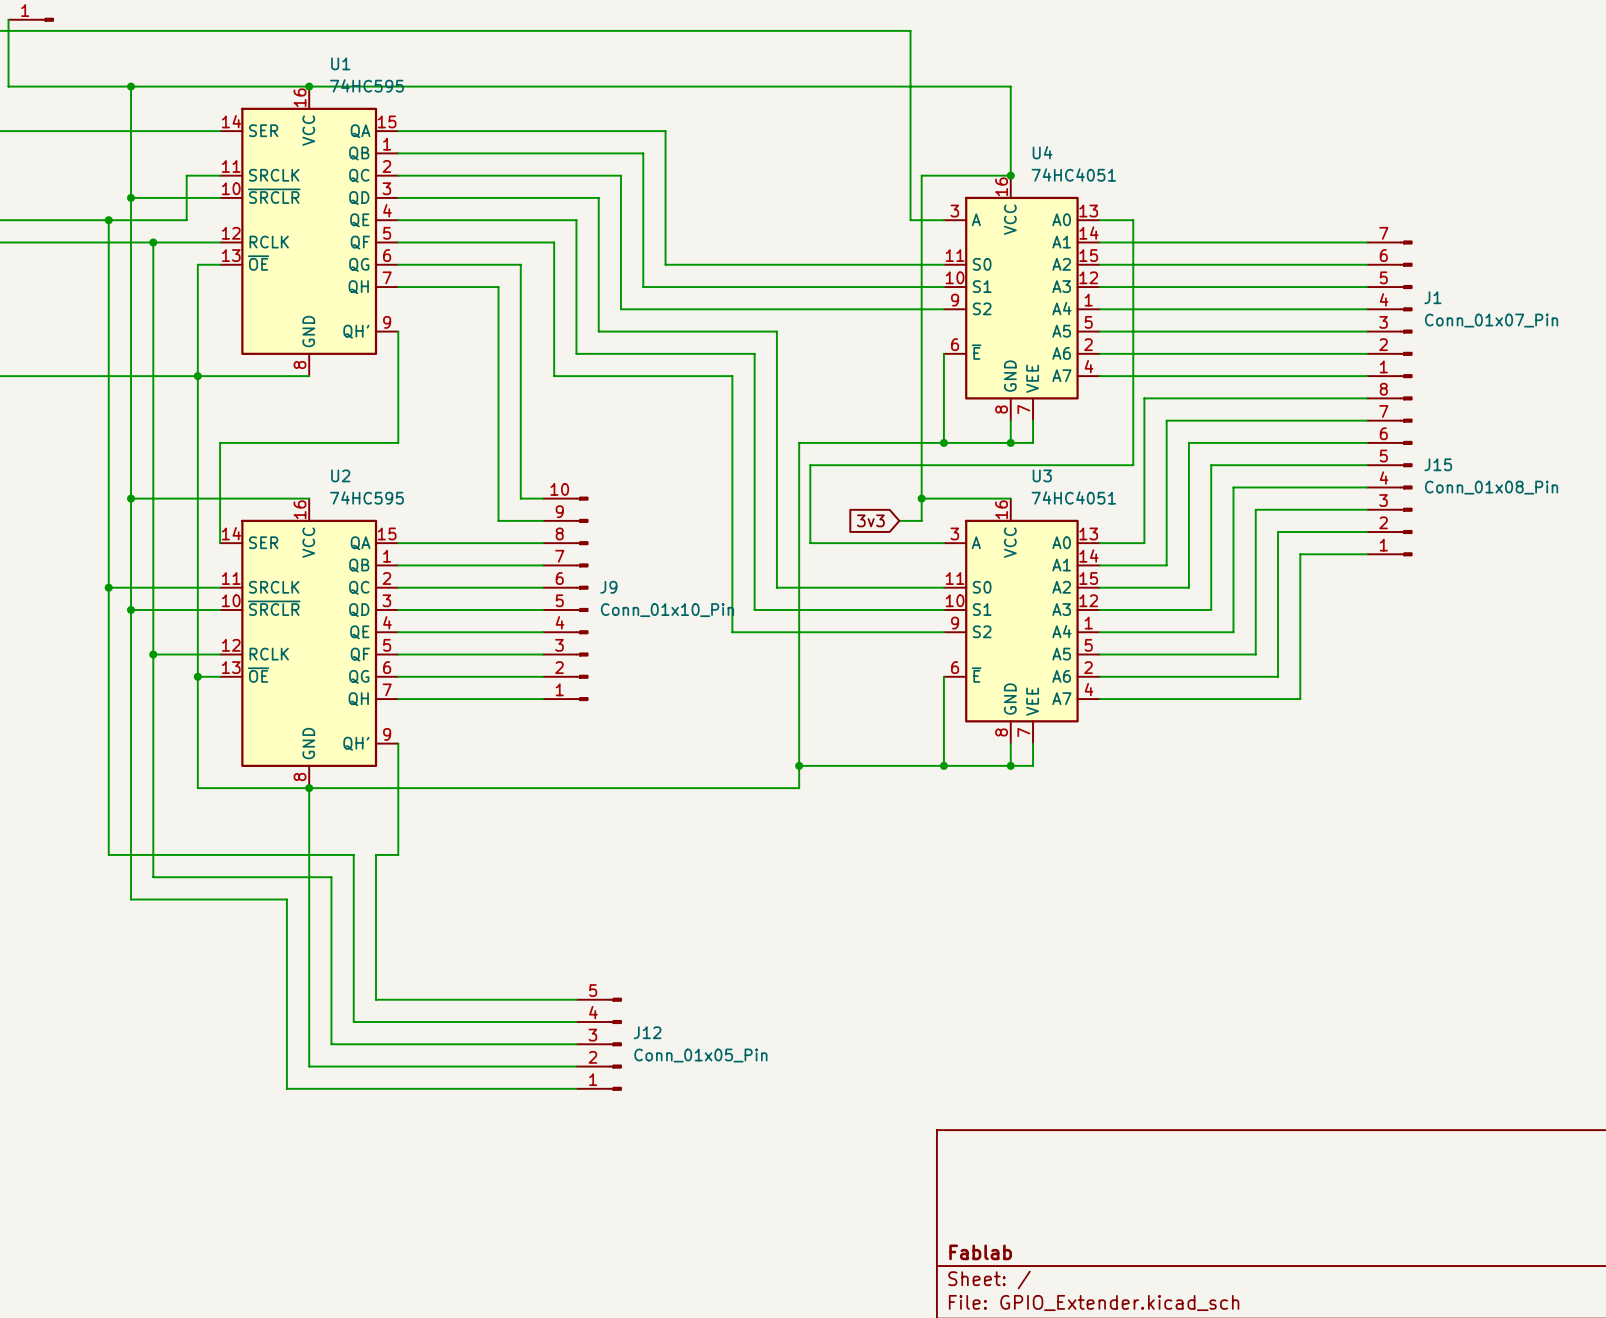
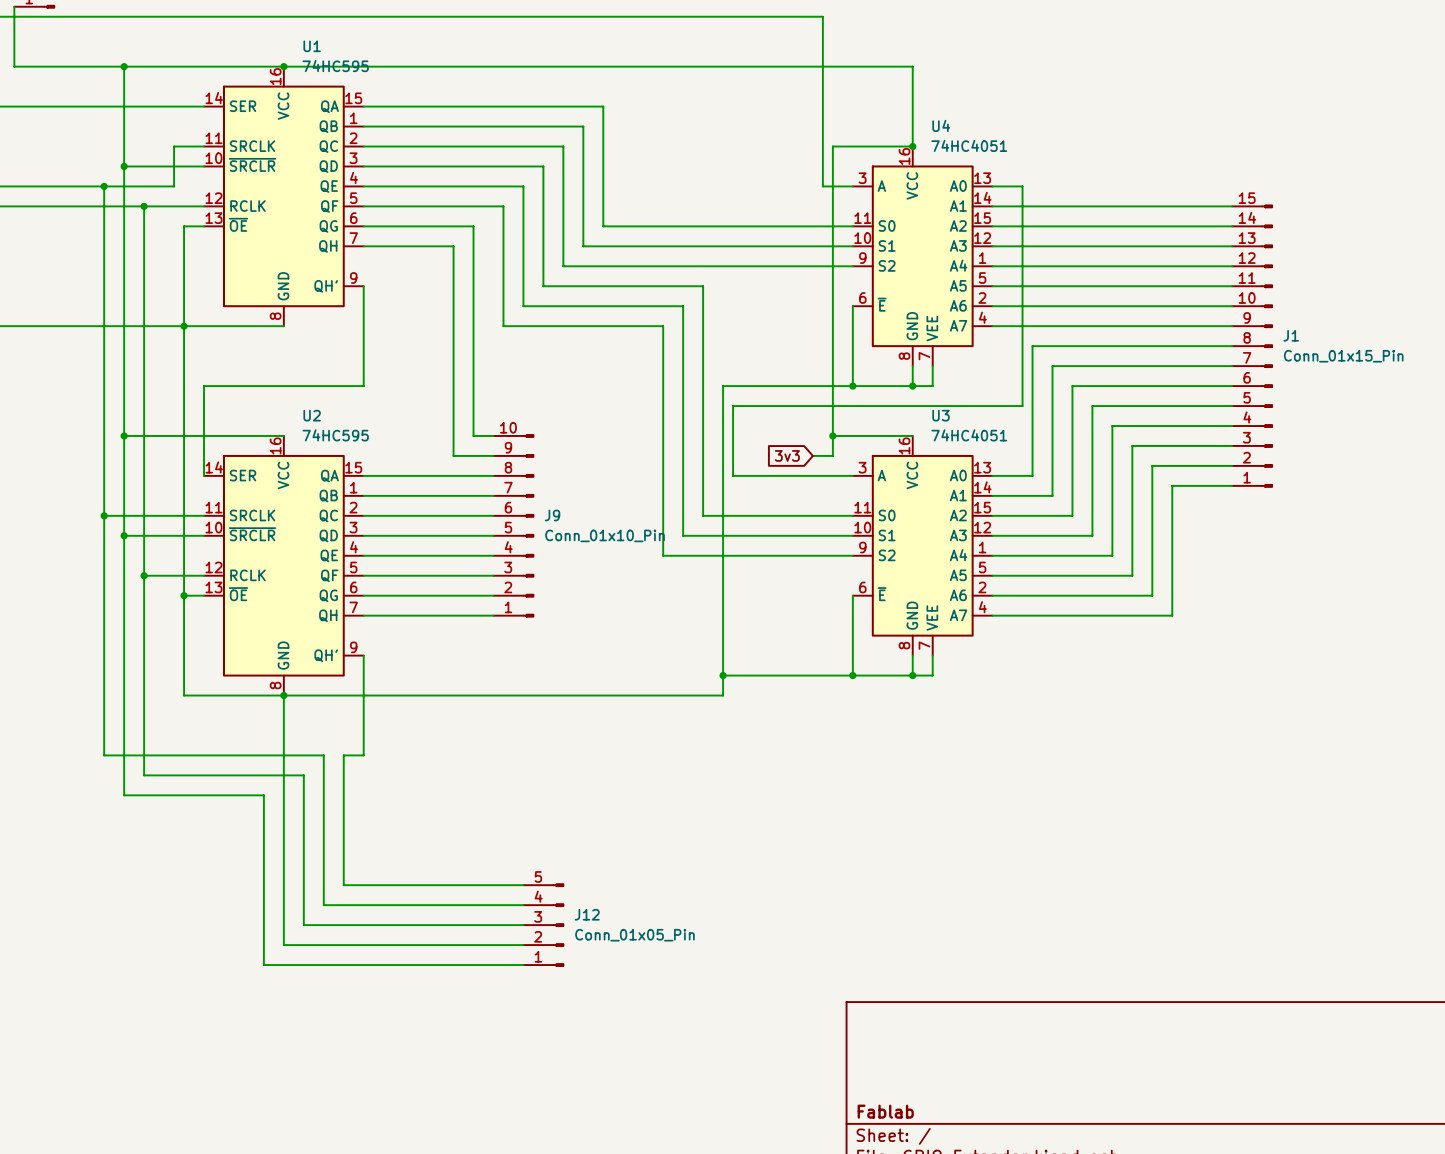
J1 symbol: [1367, 240, 1413, 378] -> [1232, 204, 1273, 488]
J1 value: Conn_01x07_Pin (1491, 320) -> Conn_01x15_Pin (1343, 356)
J15: Conn_01x08_Pin (1389, 476) -> none

